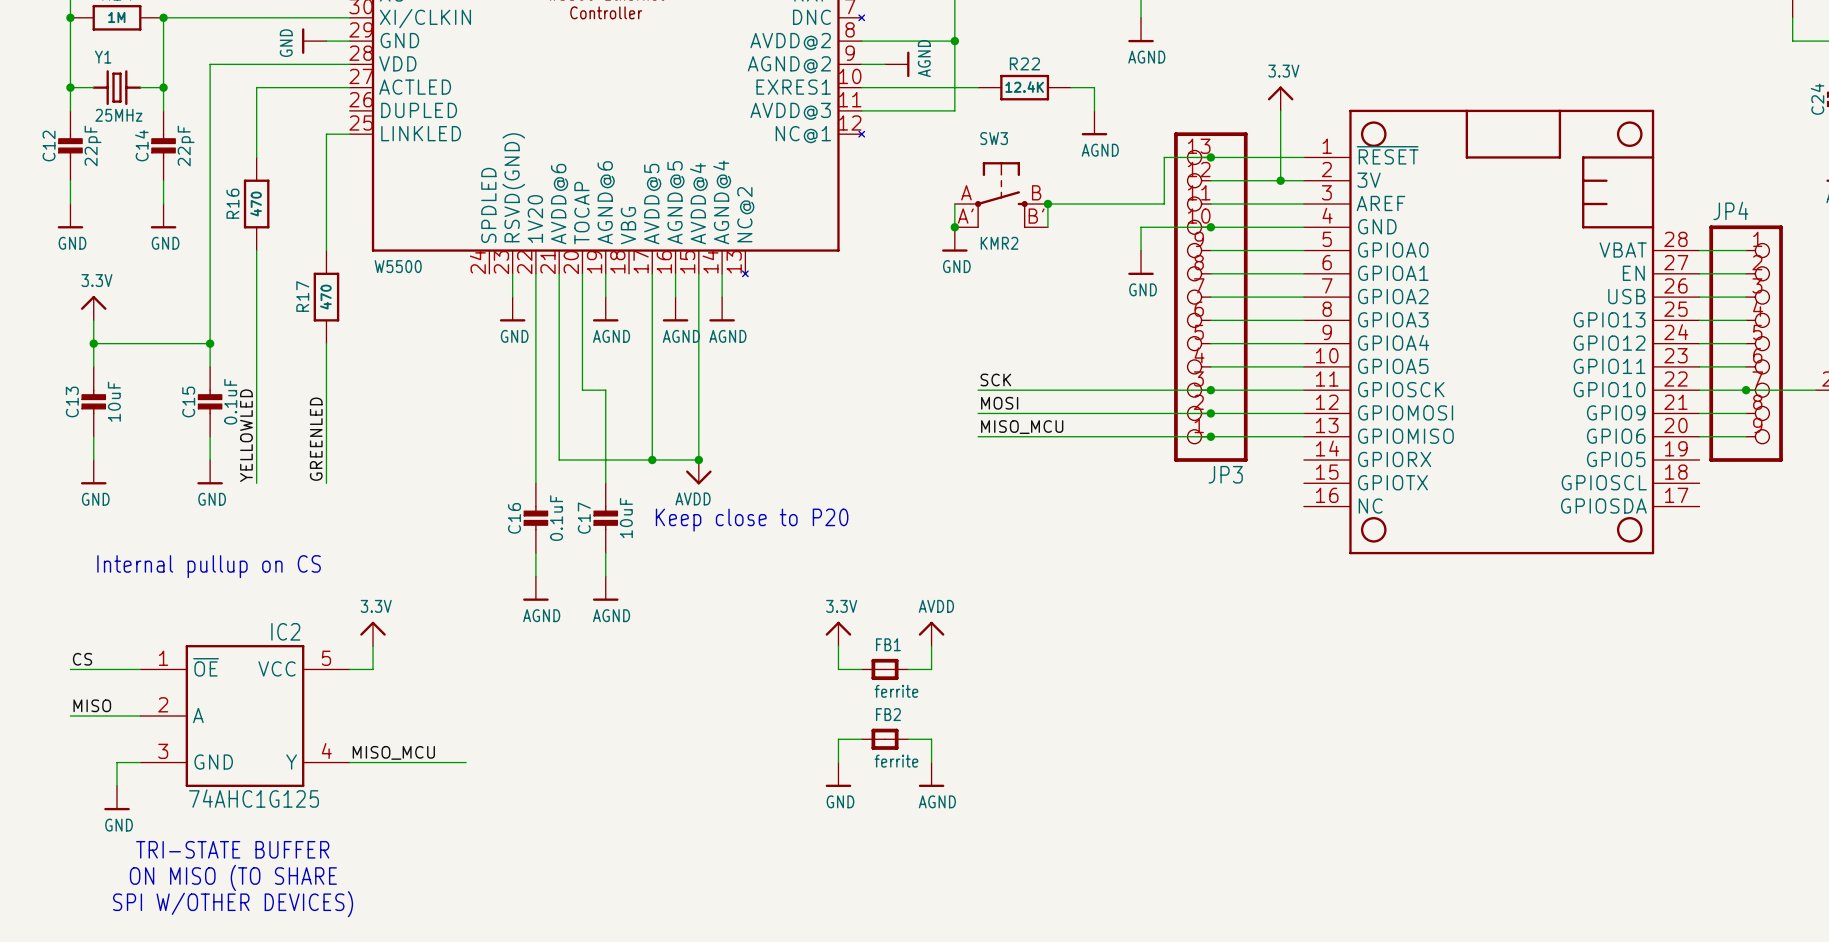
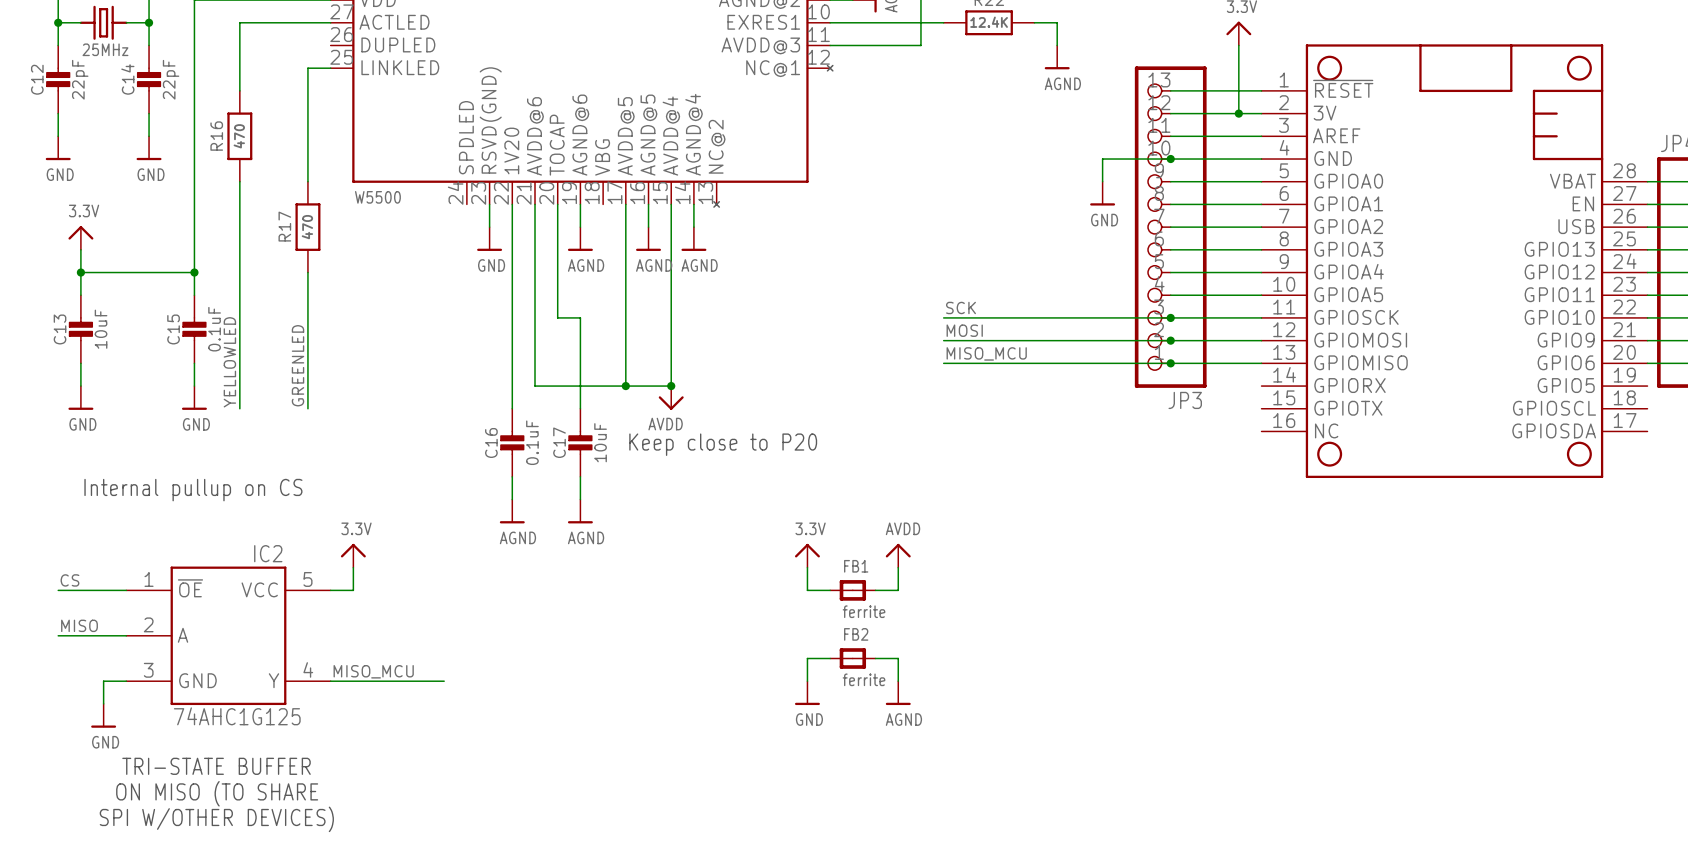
wire: (1210, 157) (1164, 157) (1164, 204) (1047, 204) (1047, 227) -> none
junction: (1210, 157) -> none
SW3: KMR2 (1001, 195) -> none
wire: (954, 204) (954, 227) -> none
junction: (1047, 204) -> none
junction: (954, 227) -> none
power symbol: GND (954, 239) -> none

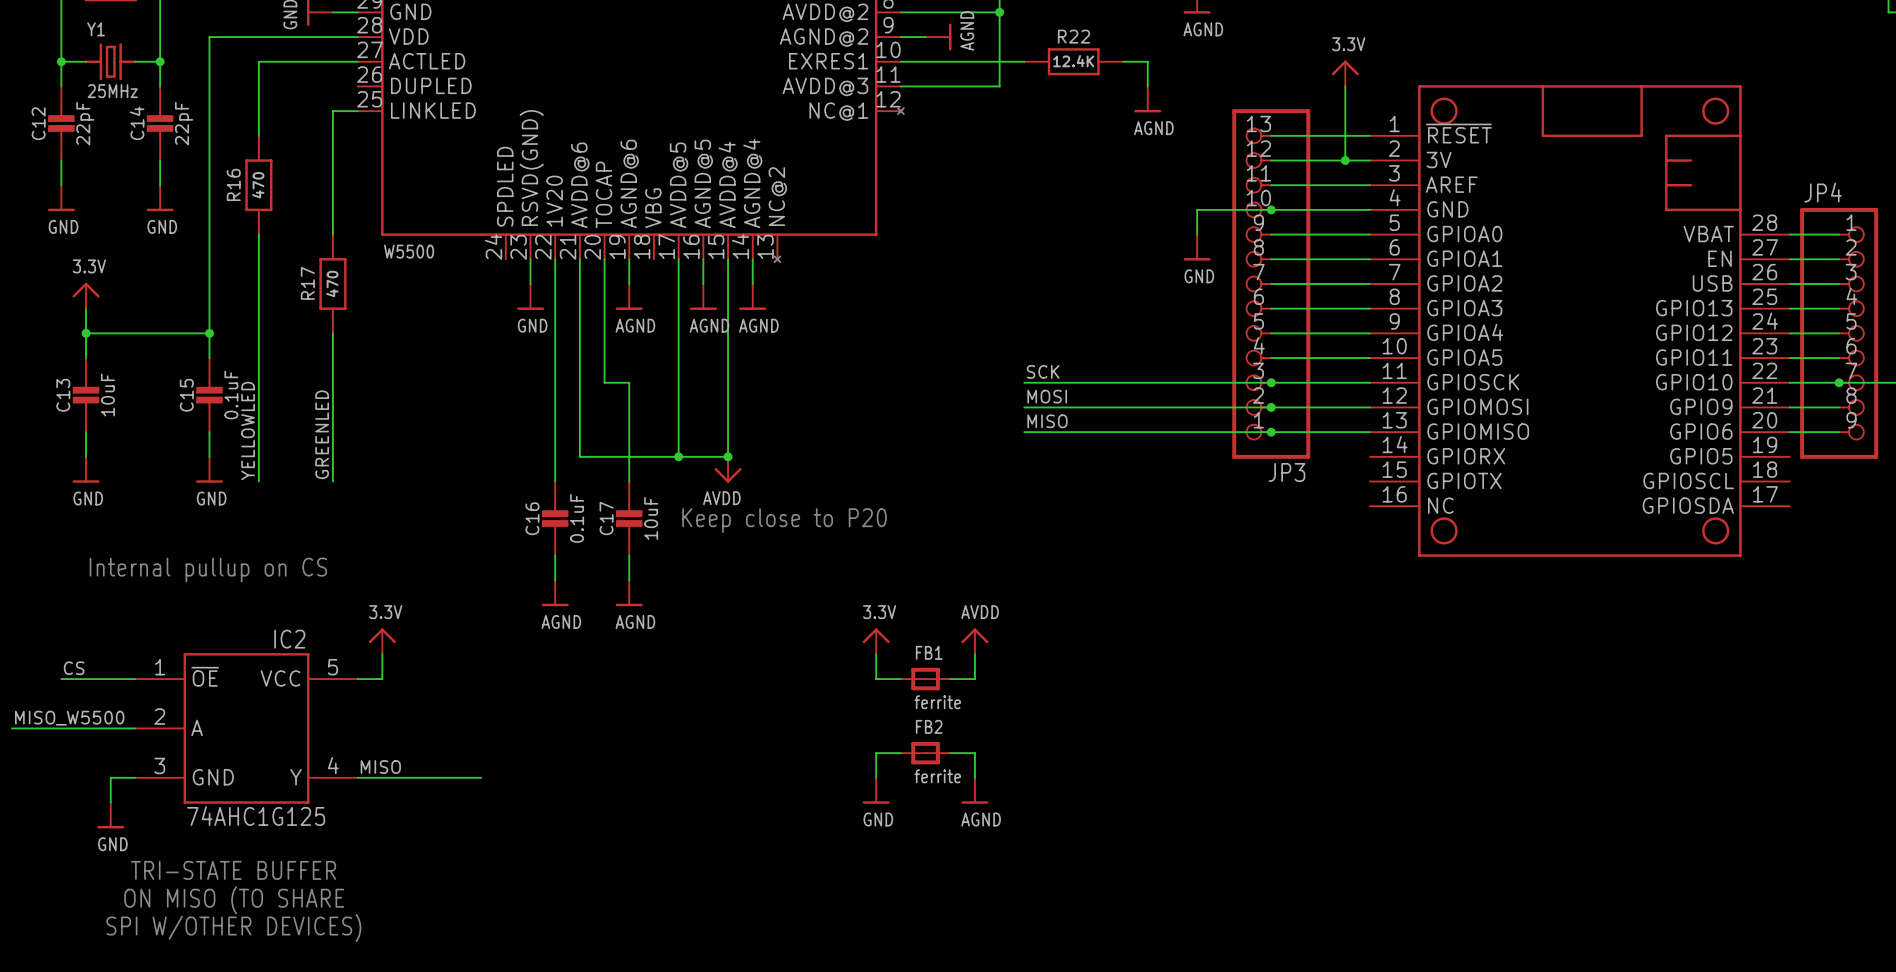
label: MISO_MCU (986, 353) -> MISO (1047, 421)
label: MISO (79, 625) -> none
label: none -> MISO_W5500 (69, 718)
wire: none -> (11, 728) (61, 728)
label: MISO_MCU (373, 671) -> MISO (380, 766)

